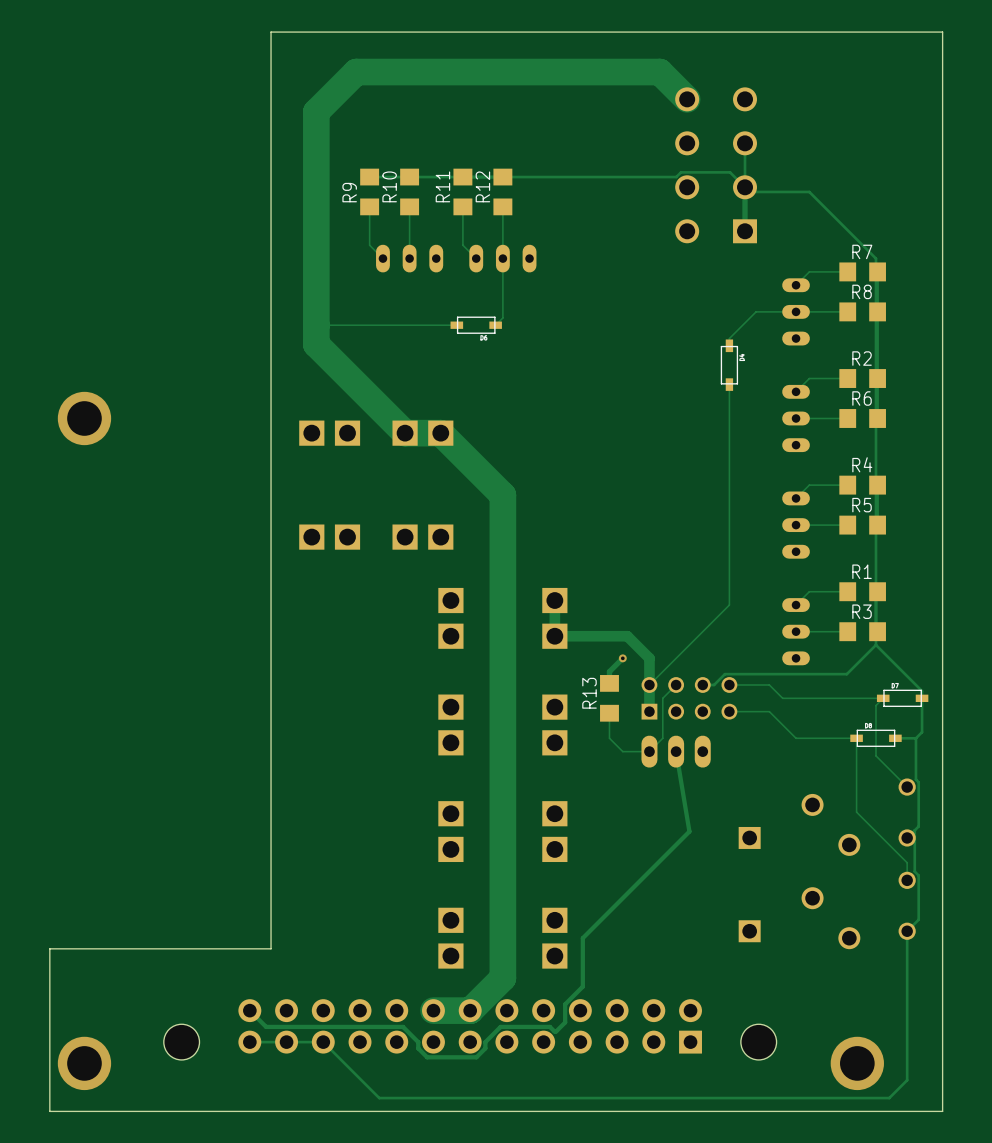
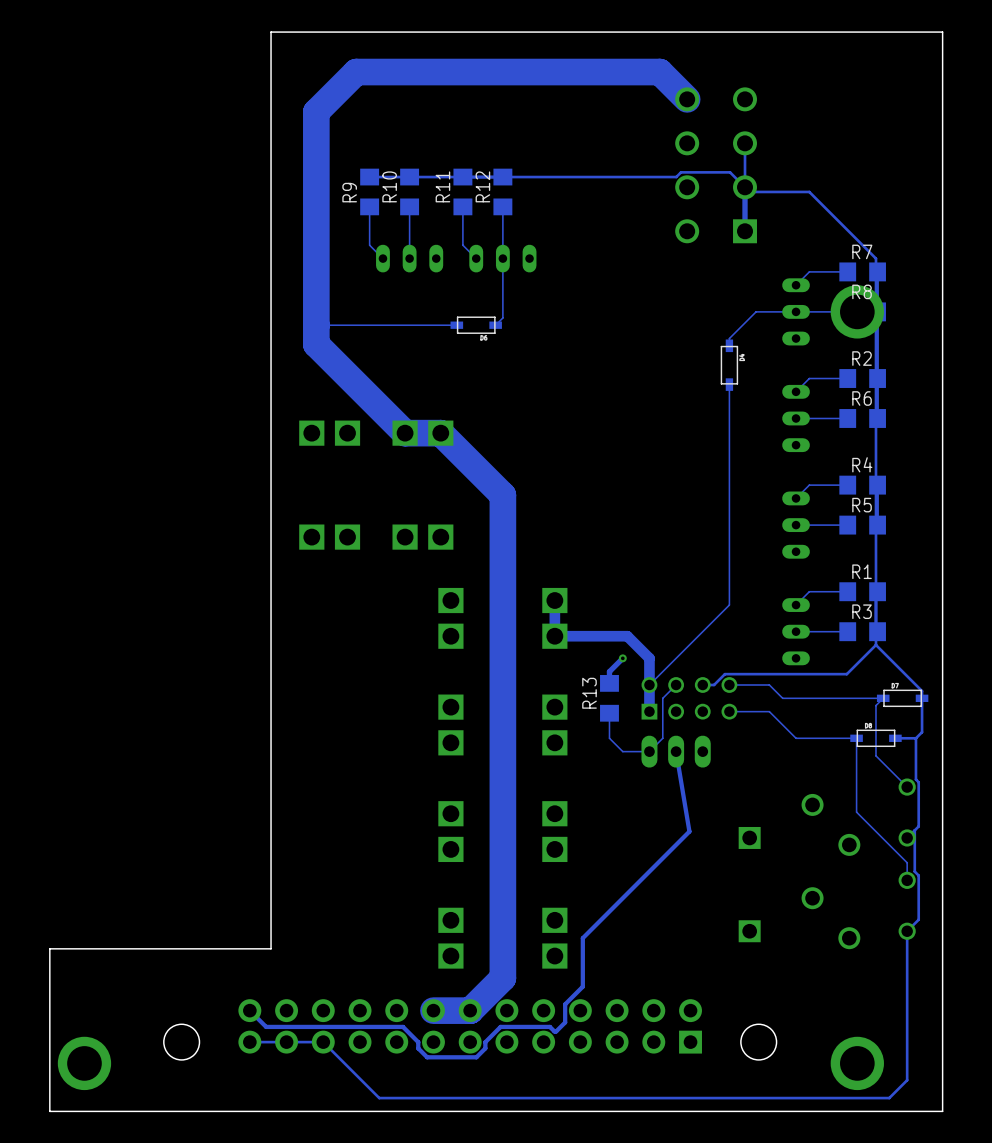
via: none -> (857, 311)
via: (84, 418) -> none

